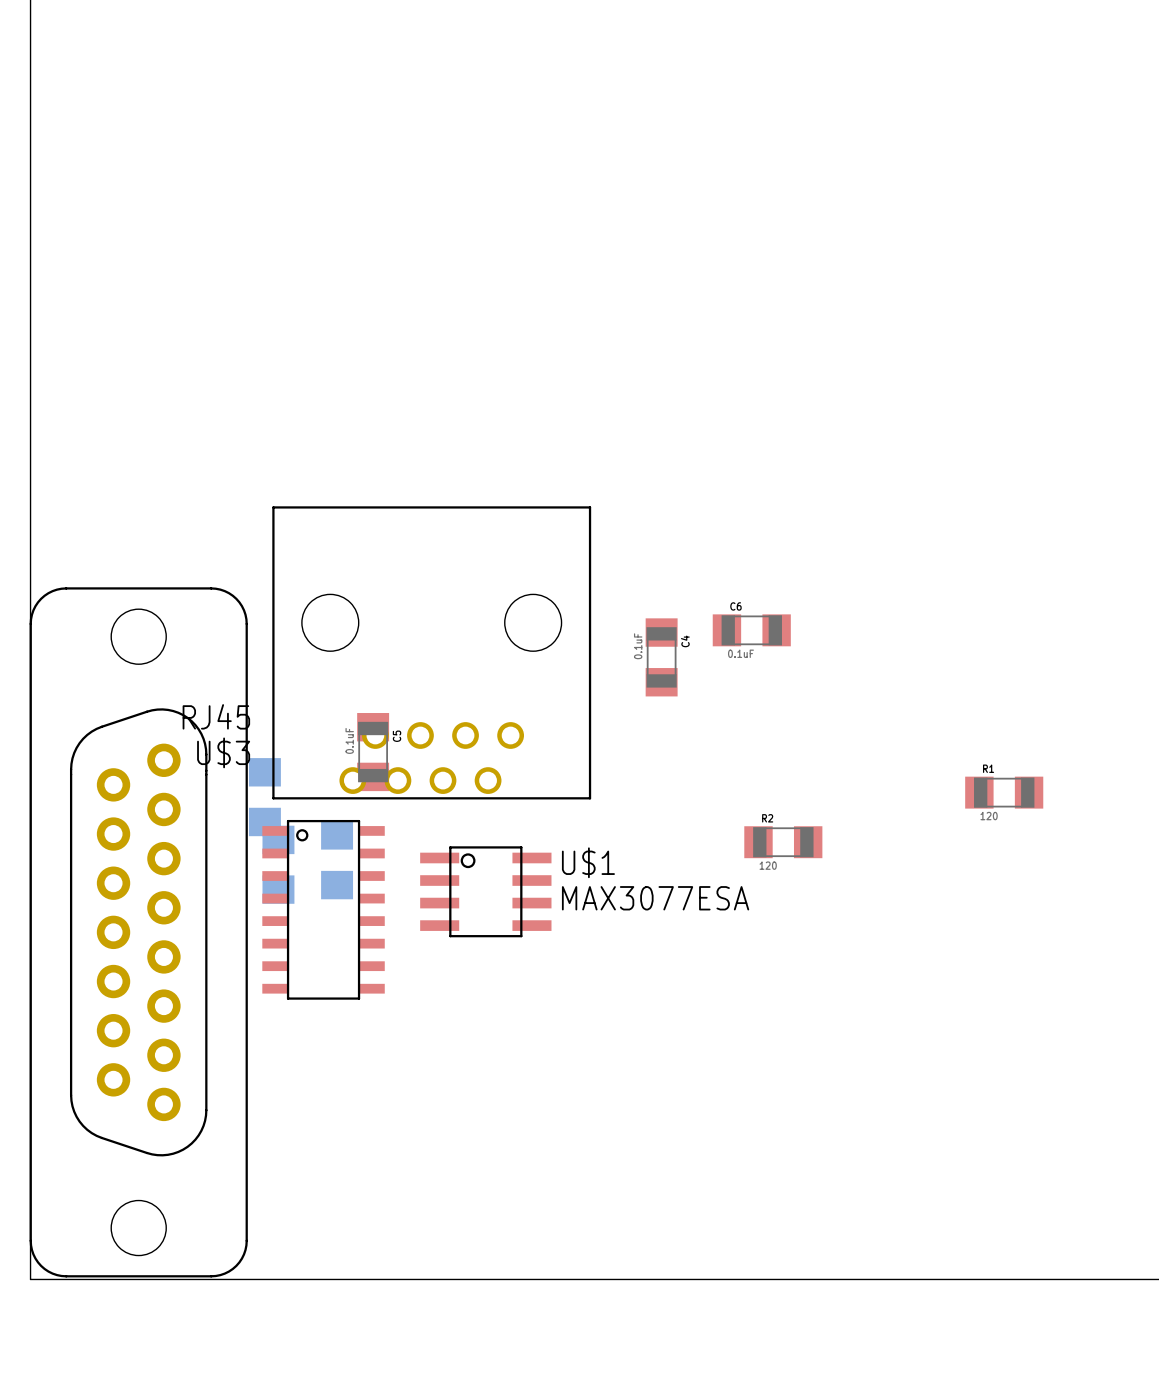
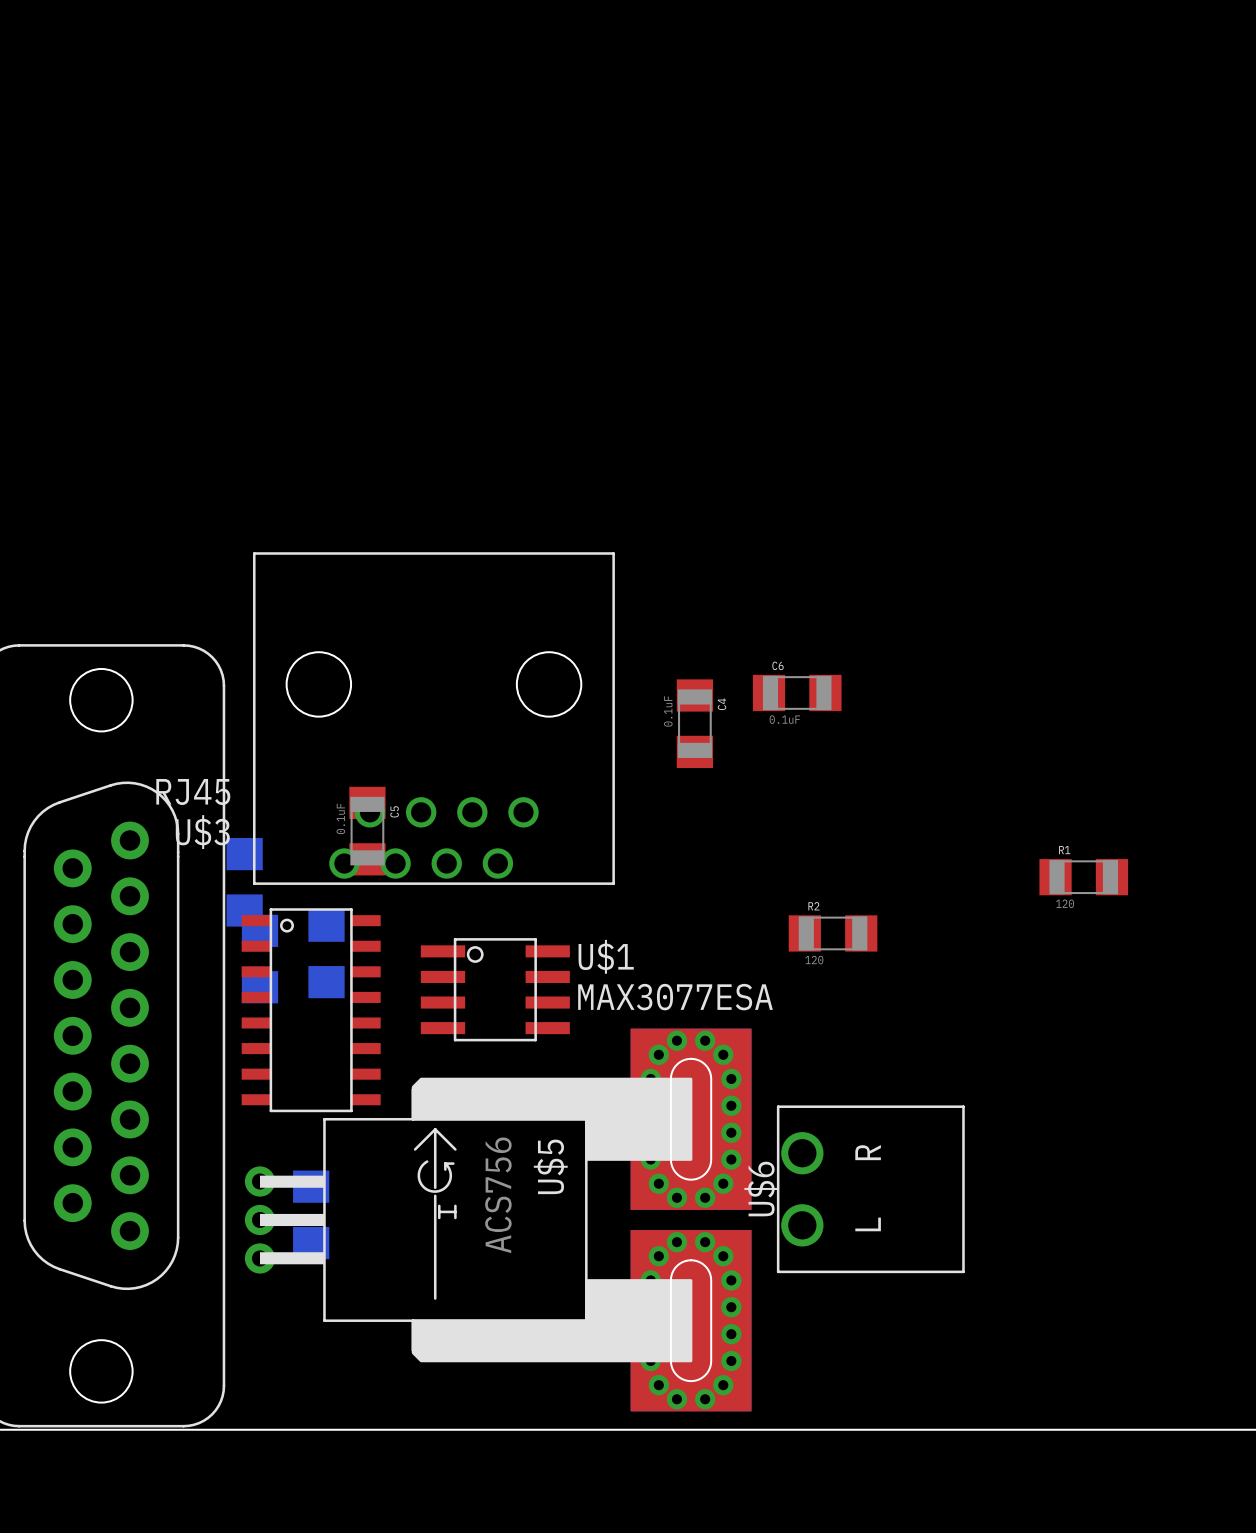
U$6: none -> (870, 1189)
part: none -> (311, 1214)
U$5: none -> ACS756 (498, 1219)

